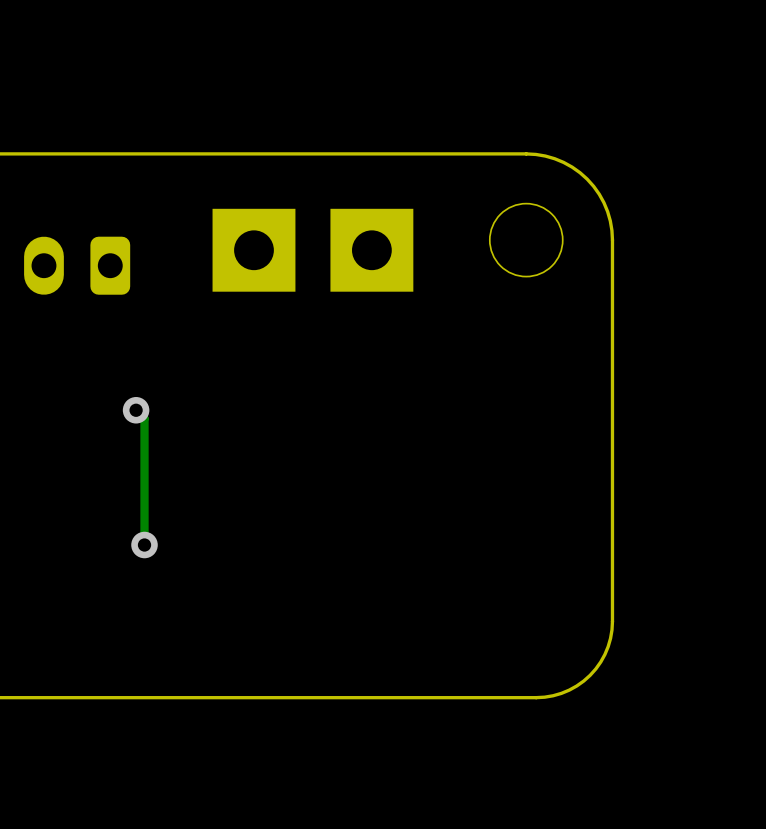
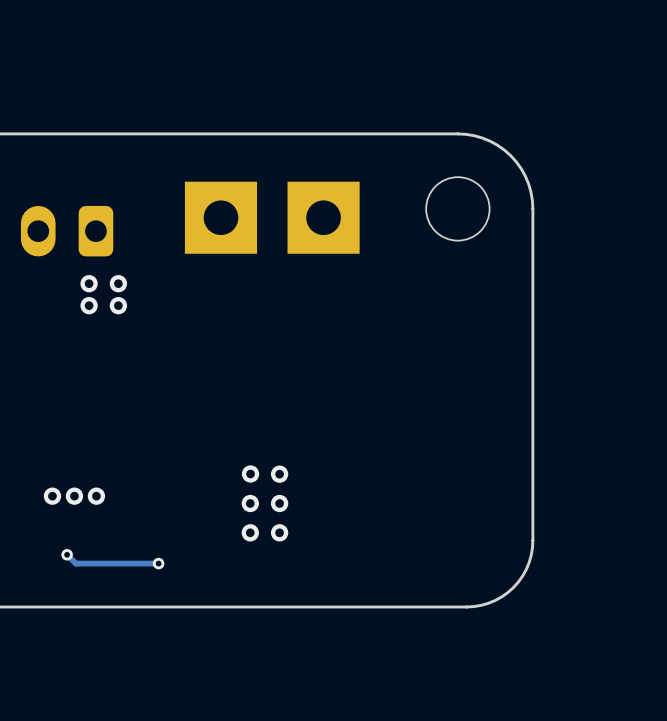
via: none -> (89, 283)
via: none -> (118, 283)
via: none -> (89, 305)
via: none -> (118, 305)
track: (136, 410) (144, 418) (144, 545) -> none
via: (136, 410) -> none
via: none -> (250, 473)
via: (144, 545) -> none
via: none -> (279, 474)
via: none -> (52, 496)
via: none -> (74, 496)
via: none -> (96, 496)
via: none -> (250, 503)
via: none -> (279, 503)
via: none -> (250, 532)
via: none -> (279, 532)
track: none -> (67, 554) (75, 563) (158, 563)
via: none -> (67, 554)
via: none -> (158, 563)

